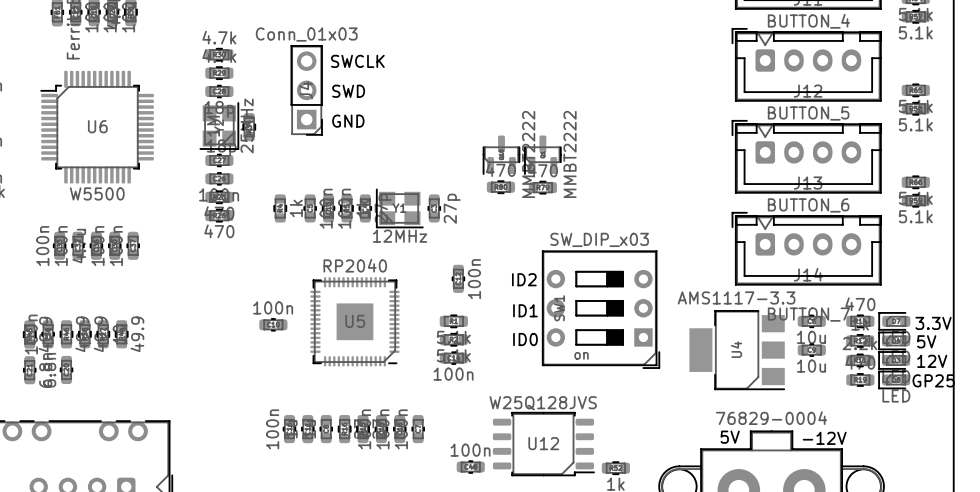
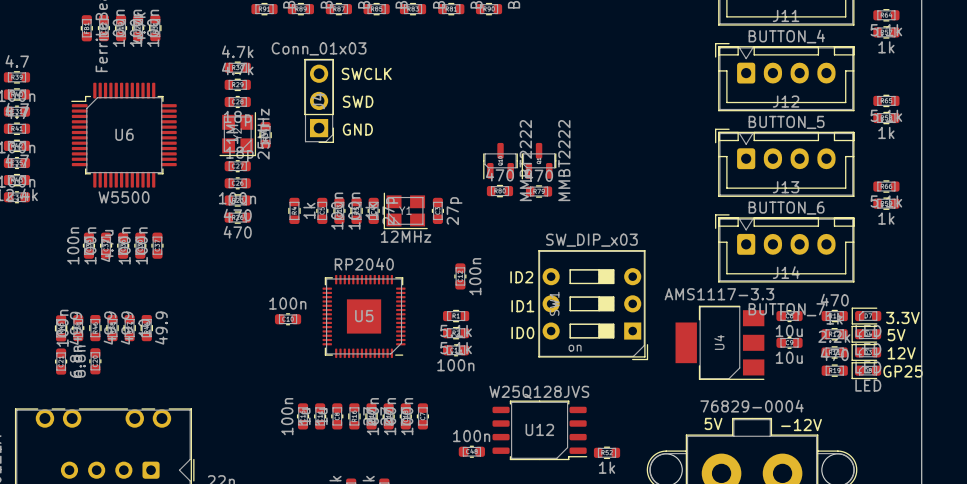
part value: 5.1k (915, 32) -> 1k (886, 47)
part value: 5.1k (915, 124) -> 1k (886, 132)
part value: 5.1k (915, 216) -> 1k (886, 218)

